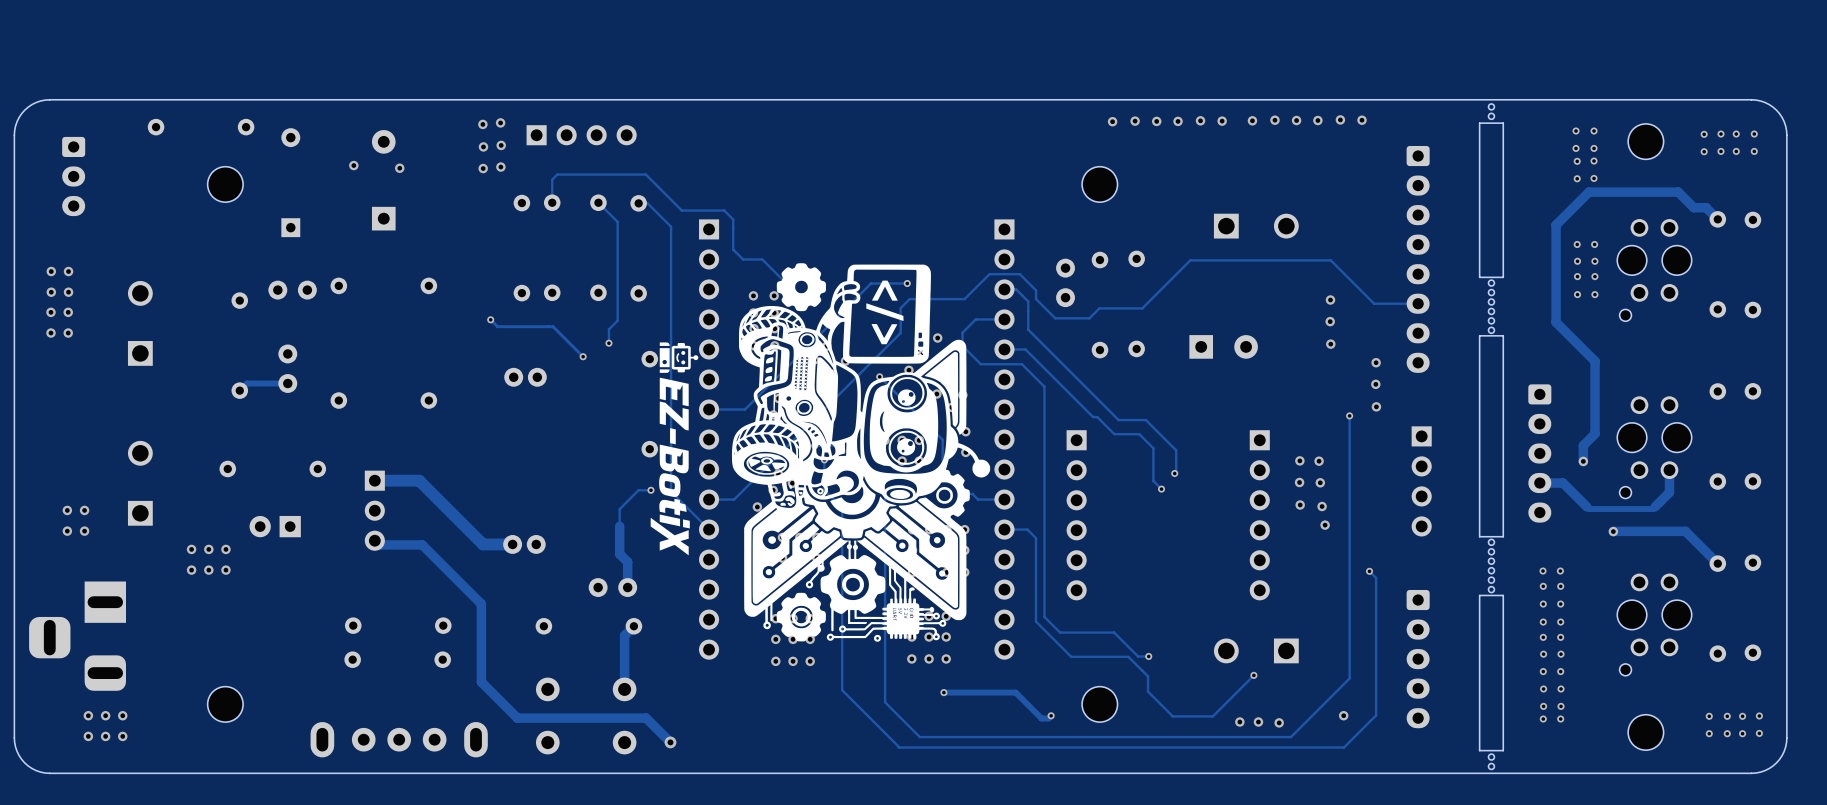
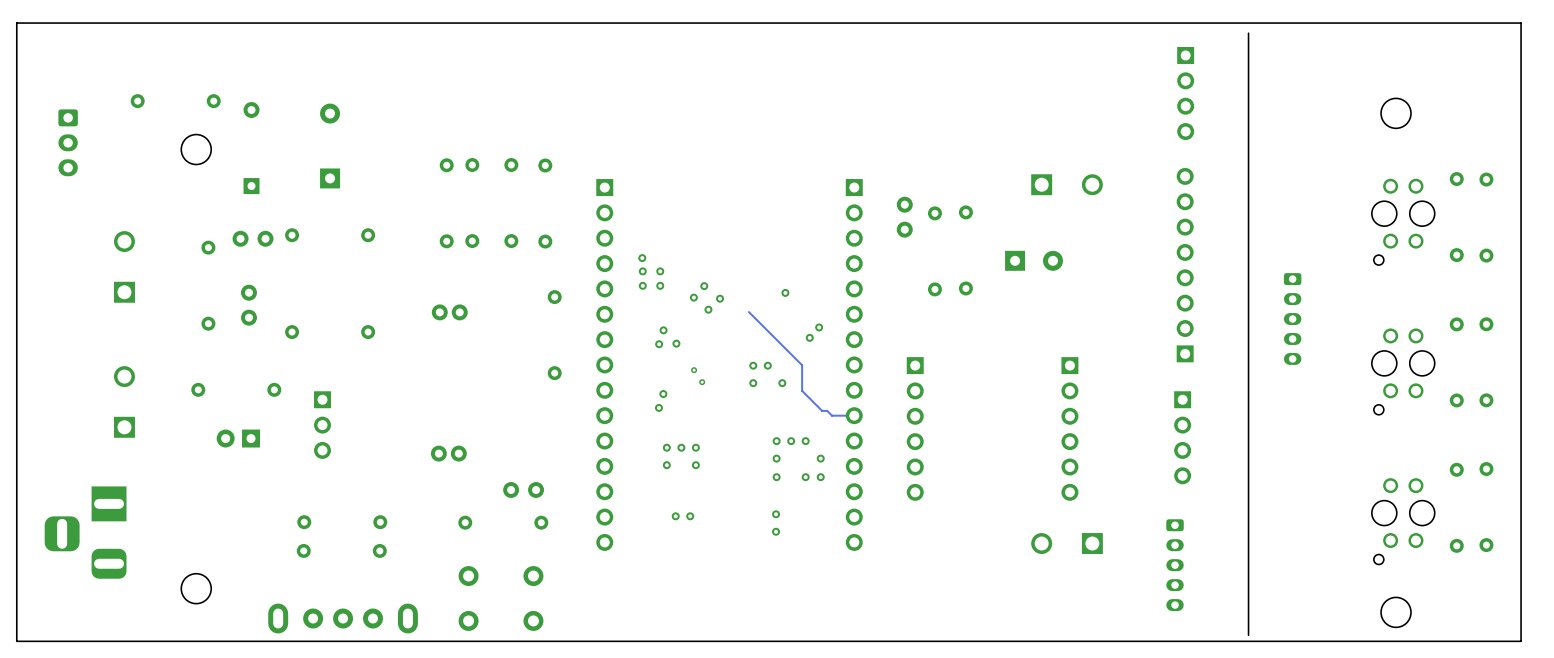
board edge: none -> (1248, 33) (1248, 635)
board edge: (1751, 99) (49, 99) (36, 102) (21, 113) (15, 126) (14, 135) (14, 737) (17, 751) (28, 766) (36, 770) (49, 773) (1751, 773) (1764, 770) (1772, 766) (1782, 755) (1786, 737) (1786, 135) (1784, 121) (1776, 110) (1764, 102) (1751, 99) -> (1521, 23) (1521, 641) (16, 641) (16, 23) (1521, 23)
round board edge: [1488, 103, 1495, 111] -> none
round board edge: [1488, 113, 1495, 120] -> none
part: none -> (1185, 93)
via: (1340, 119) -> none
via: (1200, 120) -> none
via: (1252, 120) -> none
via: (1274, 120) -> none
via: (1296, 120) -> none
via: (1317, 120) -> none
via: (1362, 120) -> none
via: (1112, 121) -> none
via: (1135, 121) -> none
via: (1156, 121) -> none
via: (1178, 121) -> none
via: (1222, 121) -> none
via: (500, 122) -> none
board edge: (1503, 123) (1479, 123) (1479, 277) (1503, 277) (1503, 123) -> none
via: (482, 124) -> none
via: (1576, 131) -> none
via: (1594, 131) -> none
via: (1704, 134) -> none
via: (1720, 134) -> none
via: (1736, 134) -> none
via: (1754, 134) -> none
part: (581, 135) -> none
via: (501, 145) -> none
via: (483, 146) -> none
via: (1576, 148) -> none
via: (1594, 148) -> none
via: (1704, 151) -> none
via: (1720, 151) -> none
via: (1736, 151) -> none
via: (1754, 151) -> none
via: (1577, 161) -> none
via: (1594, 161) -> none
via: (353, 165) -> none
via: (500, 167) -> none
via: (399, 168) -> none
via: (483, 168) -> none
via: (1577, 178) -> none
via: (1594, 178) -> none
part: (1099, 184) -> none
track: (552, 202) (552, 179) (557, 174) (645, 174) (681, 210) (724, 210) (733, 219) (733, 249) (743, 259) (762, 259) (804, 301) -> none
track: (598, 202) (617, 221) (617, 320) (608, 329) (608, 343) -> none
track: (638, 203) (647, 203) (671, 226) (671, 491) (709, 529) -> none
track: (1717, 219) (1706, 207) (1693, 207) (1678, 192) (1589, 192) (1556, 225) (1556, 322) (1595, 361) (1595, 433) (1583, 445) (1583, 461) -> none
via: (1577, 244) -> none
via: (1594, 244) -> none
part: (1418, 259) -> none
via: (1577, 261) -> none
via: (1594, 261) -> none
drawing: [731, 263, 991, 642] -> none
via: (51, 271) -> none
via: (68, 271) -> none
via: (1577, 276) -> none
via: (1594, 276) -> none
round board edge: [1488, 279, 1495, 287] -> none
part position: (1065, 282) -> (904, 217)
track: (907, 283) (870, 283) (744, 409) (709, 409) -> none
via: (907, 283) -> none
track: (1004, 289) (1016, 289) (1028, 301) (1028, 329) (1118, 420) (1145, 420) (1176, 450) (1174, 473) -> none
round board edge: [1488, 289, 1495, 296] -> none
via: (51, 292) -> none
via: (68, 292) -> none
via: (1577, 294) -> none
via: (1594, 294) -> none
via: (753, 295) -> none
via: (774, 295) -> none
round board edge: [1488, 298, 1495, 306] -> none
via: (1330, 300) -> none
track: (1418, 303) (1374, 303) (1330, 260) (1190, 260) (1142, 308) (1099, 308) (1089, 318) (1055, 318) (1036, 299) (1036, 290) (1019, 274) (989, 274) (964, 299) (909, 299) (900, 308) (900, 333) (734, 499) (709, 499) -> none
round board edge: [1488, 308, 1495, 315] -> none
via: (50, 312) -> none
via: (68, 312) -> none
via: (774, 312) -> none
round board edge: [1488, 317, 1495, 325] -> none
track: (490, 319) (497, 326) (553, 326) (583, 356) -> none
via: (490, 319) -> none
track: (1004, 319) (975, 319) (962, 332) (962, 345) (980, 364) (1021, 364) (1044, 386) (1044, 616) (1060, 632) (1114, 632) (1138, 656) (1148, 656) -> none
via: (1330, 321) -> none
part: none -> (1185, 265)
round board edge: [1488, 327, 1495, 334] -> none
via: (50, 333) -> none
via: (68, 333) -> none
board edge: (1503, 335) (1503, 536) (1479, 536) (1479, 335) (1503, 335) -> none
via: (937, 338) -> none
drawing: [650, 342, 699, 556] -> none
via: (608, 343) -> none
via: (1330, 344) -> none
part position: (1223, 346) -> (1034, 260)
track: (1004, 349) (1025, 349) (1093, 417) (1097, 417) (1114, 434) (1139, 434) (1153, 448) (1153, 480) (1161, 489) -> none
via: (583, 356) -> none
via: (1376, 362) -> none
via: (908, 370) -> none
via: (879, 376) -> none
track: (287, 383) (246, 383) (239, 390) -> none
via: (1375, 384) -> none
part: none -> (1292, 319)
via: (936, 394) -> none
via: (1376, 406) -> none
track: (1349, 415) (1349, 678) (1291, 737) (919, 737) (885, 702) (885, 490) (840, 445) (814, 445) -> none
via: (1349, 415) -> none
via: (965, 431) -> none
via: (919, 440) -> none
via: (965, 452) -> none
part: (1539, 453) -> none
track: (824, 459) (824, 490) (842, 508) (842, 690) (898, 747) (1344, 747) (1376, 715) (1376, 577) (1369, 571) -> none
via: (1299, 460) -> none
via: (902, 461) -> none
via: (1319, 461) -> none
via: (1583, 461) -> none
track: (1669, 470) (1669, 492) (1652, 509) (1589, 509) (1563, 483) (1539, 483) -> none
via: (1174, 473) -> none
track: (374, 480) (419, 480) (483, 544) (512, 544) -> none
part position: (1421, 481) -> (1182, 437)
via: (1299, 482) -> none
via: (1320, 482) -> none
via: (792, 483) -> none
via: (1161, 489) -> none
track: (650, 490) (638, 490) (619, 509) (619, 554) (627, 562) (627, 587) -> none
via: (650, 490) -> none
via: (1300, 505) -> none
via: (1322, 506) -> none
via: (757, 507) -> none
via: (67, 510) -> none
via: (84, 510) -> none
via: (1325, 525) -> none
via: (964, 529) -> none
track: (1004, 529) (1027, 529) (1036, 538) (1036, 621) (1071, 656) (1128, 656) (1148, 676) (1148, 691) (1172, 716) (1212, 716) (1253, 675) -> none
via: (67, 531) -> none
via: (84, 531) -> none
track: (1613, 531) (1685, 531) (1717, 563) -> none
via: (1613, 531) -> none
round board edge: [1488, 539, 1495, 546] -> none
track: (374, 540) (379, 544) (422, 544) (481, 604) (481, 682) (517, 718) (646, 718) (670, 742) -> none
round board edge: [1488, 548, 1495, 556] -> none
via: (191, 549) -> none
via: (208, 549) -> none
via: (225, 549) -> none
round board edge: [1488, 558, 1495, 565] -> none
round board edge: [1488, 567, 1495, 574] -> none
via: (191, 570) -> none
via: (208, 570) -> none
via: (225, 570) -> none
via: (1369, 571) -> none
via: (1542, 571) -> none
via: (1560, 571) -> none
round board edge: [1488, 576, 1495, 584] -> none
round board edge: [1488, 586, 1495, 593] -> none
via: (1543, 586) -> none
via: (1560, 586) -> none
board edge: (1503, 595) (1503, 750) (1479, 750) (1479, 595) (1503, 595) -> none
via: (1543, 604) -> none
via: (1560, 604) -> none
via: (929, 616) -> none
via: (946, 616) -> none
via: (775, 618) -> none
via: (1543, 622) -> none
via: (1560, 622) -> none
track: (633, 626) (624, 635) (624, 689) -> none
part position: (77, 636) -> (85, 532)
via: (929, 636) -> none
via: (946, 636) -> none
via: (1543, 637) -> none
via: (1560, 637) -> none
via: (775, 639) -> none
via: (793, 639) -> none
via: (810, 639) -> none
via: (1543, 654) -> none
via: (1561, 654) -> none
via: (1148, 656) -> none
via: (911, 658) -> none
via: (929, 658) -> none
via: (946, 658) -> none
part: (1418, 659) -> none
via: (775, 661) -> none
via: (793, 661) -> none
via: (810, 661) -> none
via: (1543, 671) -> none
via: (1560, 671) -> none
via: (1253, 675) -> none
part: none -> (1175, 565)
via: (1543, 688) -> none
via: (1561, 688) -> none
track: (943, 692) (1015, 692) (1041, 718) (1048, 718) (1051, 715) -> none
via: (943, 692) -> none
part: (1099, 704) -> none
via: (1543, 706) -> none
via: (1561, 706) -> none
via: (88, 715) -> none
via: (105, 715) -> none
via: (122, 715) -> none
via: (1051, 715) -> none
via: (1343, 715) -> none
via: (1709, 716) -> none
via: (1727, 716) -> none
via: (1742, 716) -> none
via: (1759, 716) -> none
via: (1543, 719) -> none
via: (1560, 719) -> none
via: (1239, 722) -> none
via: (1258, 722) -> none
via: (1279, 722) -> none
via: (1709, 733) -> none
via: (1727, 733) -> none
via: (1742, 733) -> none
via: (1759, 733) -> none
via: (88, 736) -> none
via: (105, 736) -> none
via: (122, 736) -> none
via: (670, 742) -> none
round board edge: [1488, 753, 1495, 761] -> none
round board edge: [1488, 763, 1495, 770] -> none

